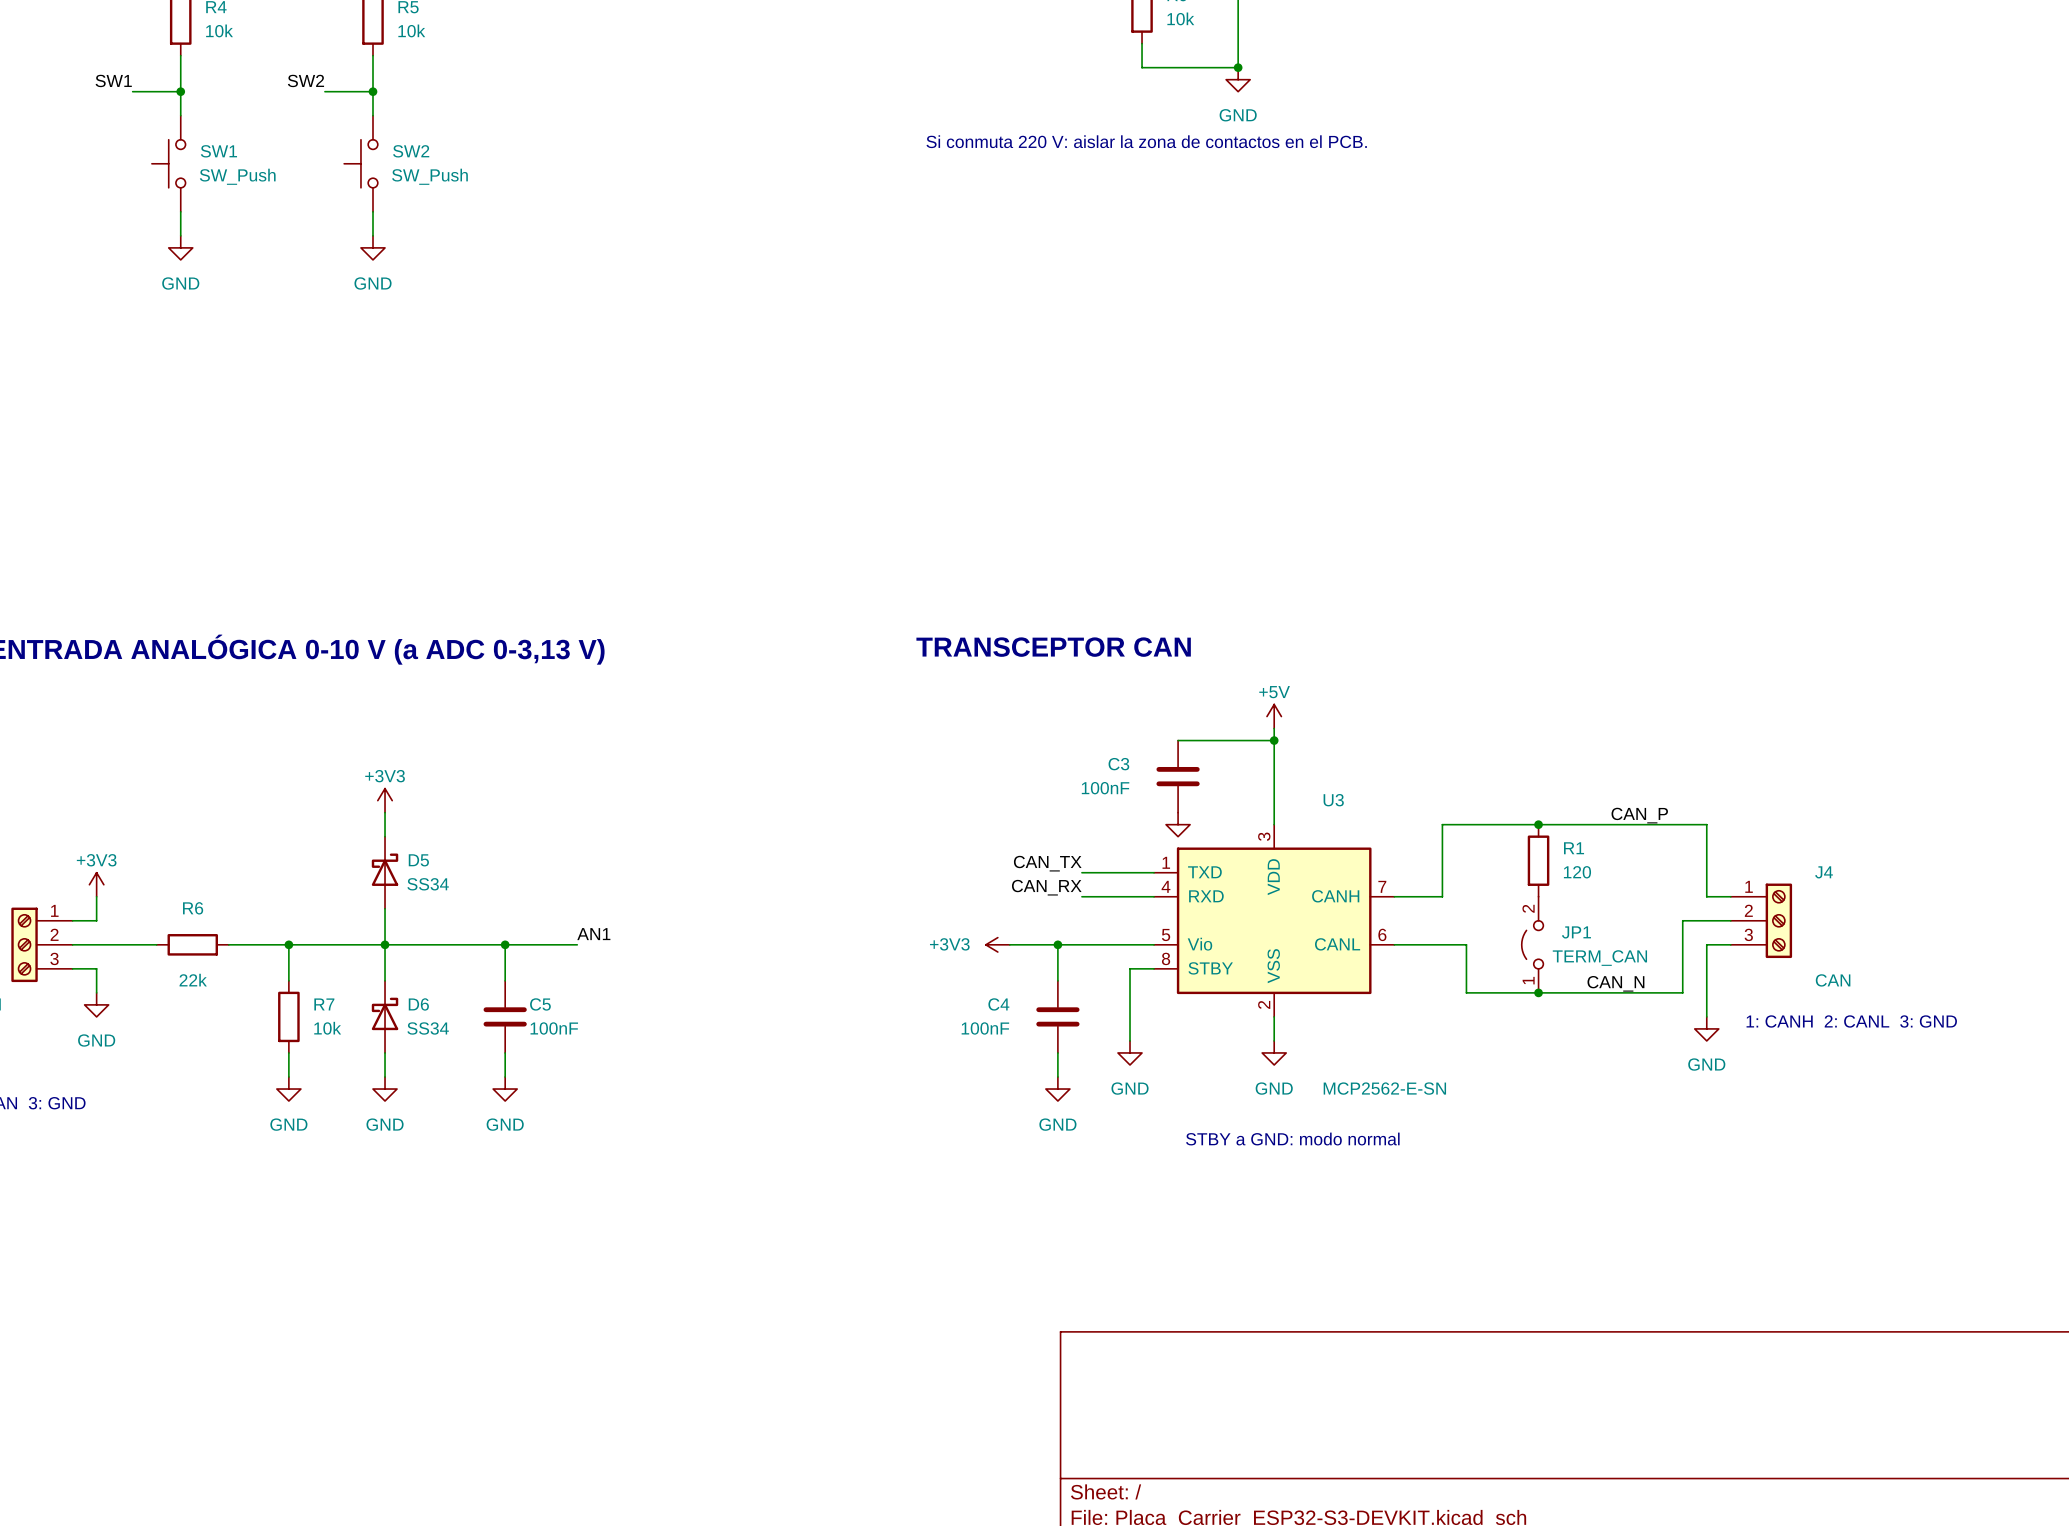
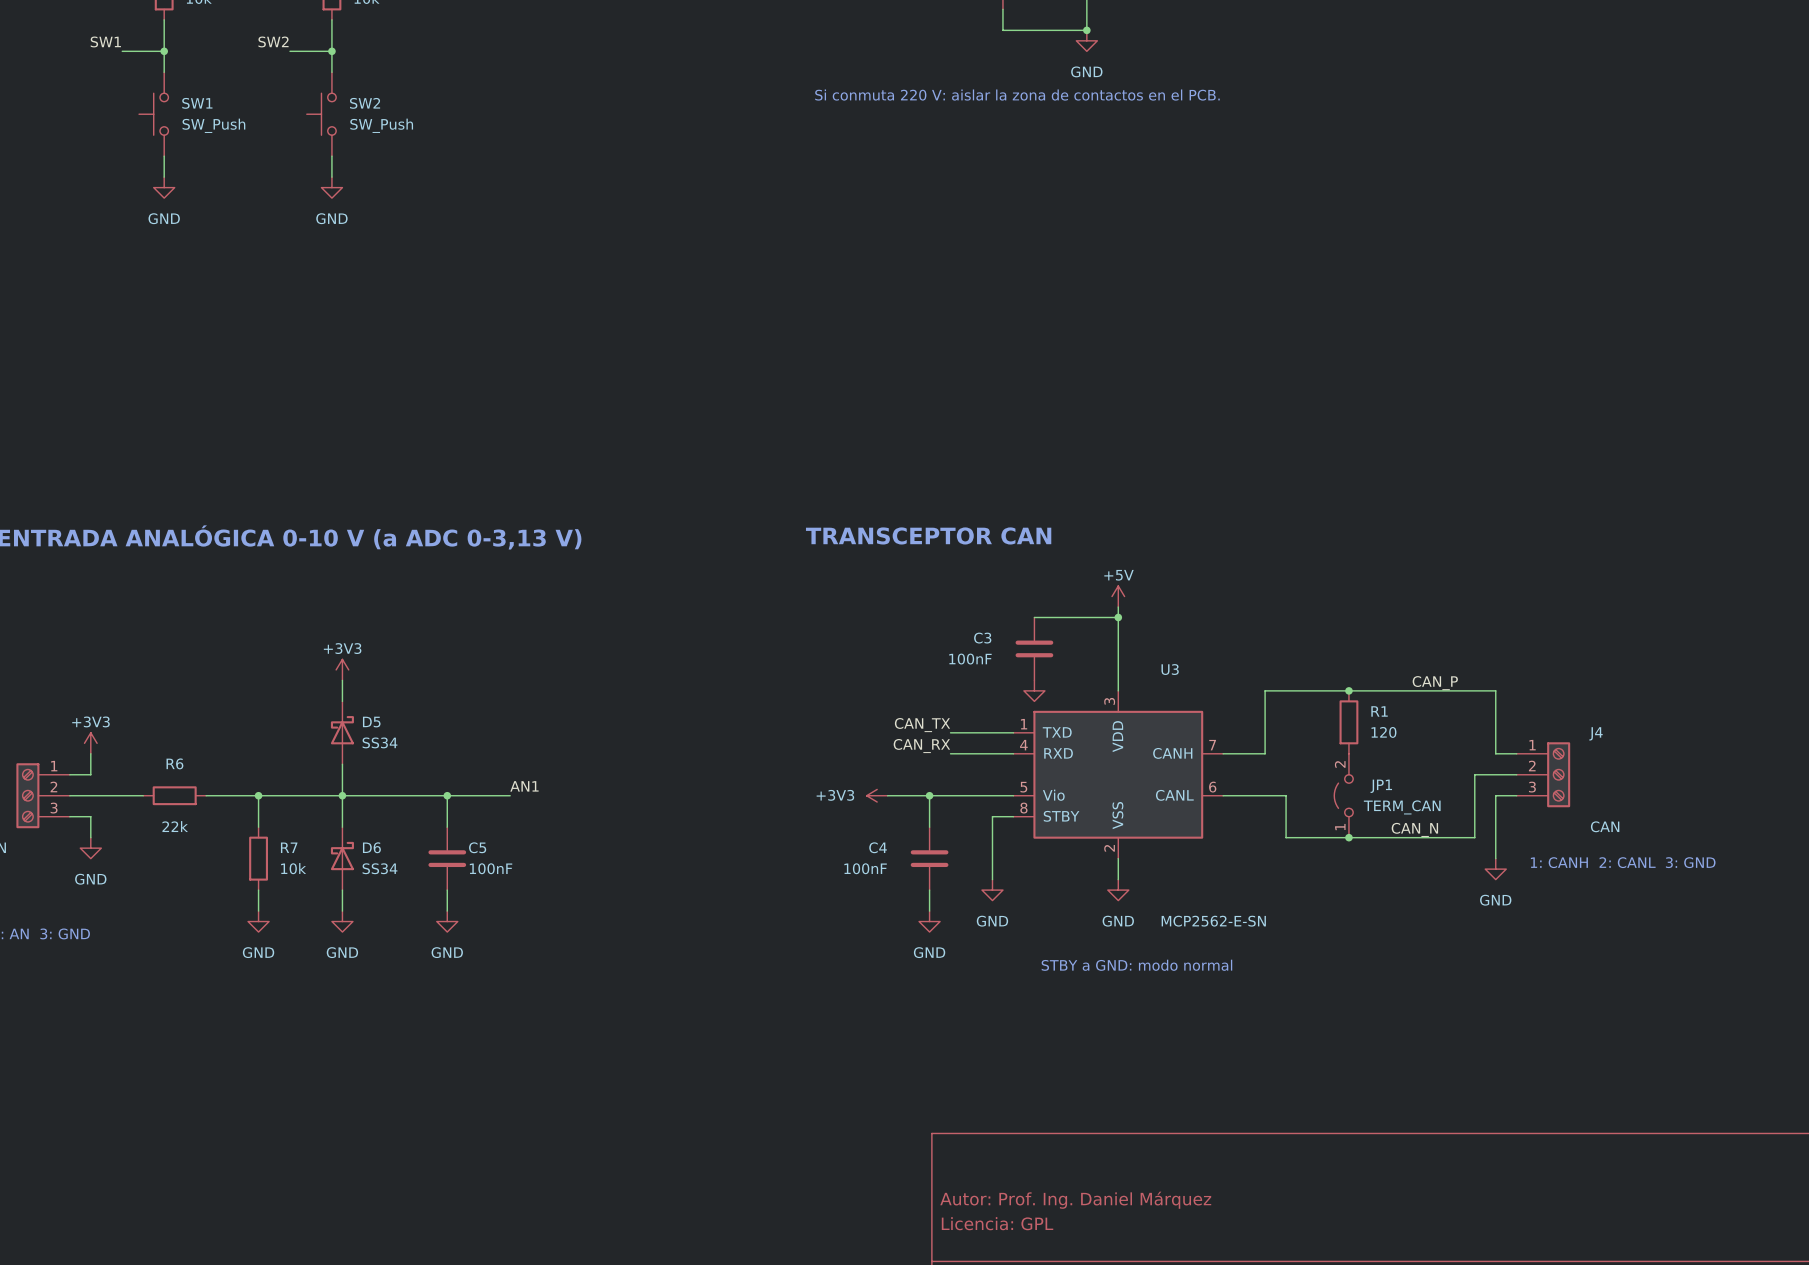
title block: none -> Autor: Prof. Ing. Daniel Márquez (1075, 1200)
title block: none -> Licencia: GPL (997, 1223)

